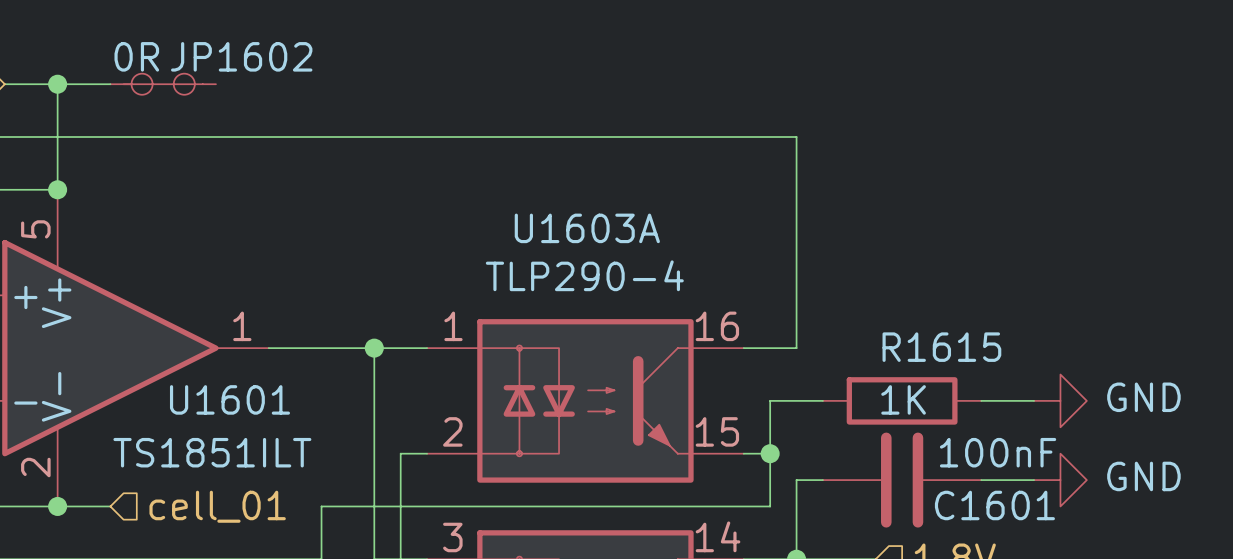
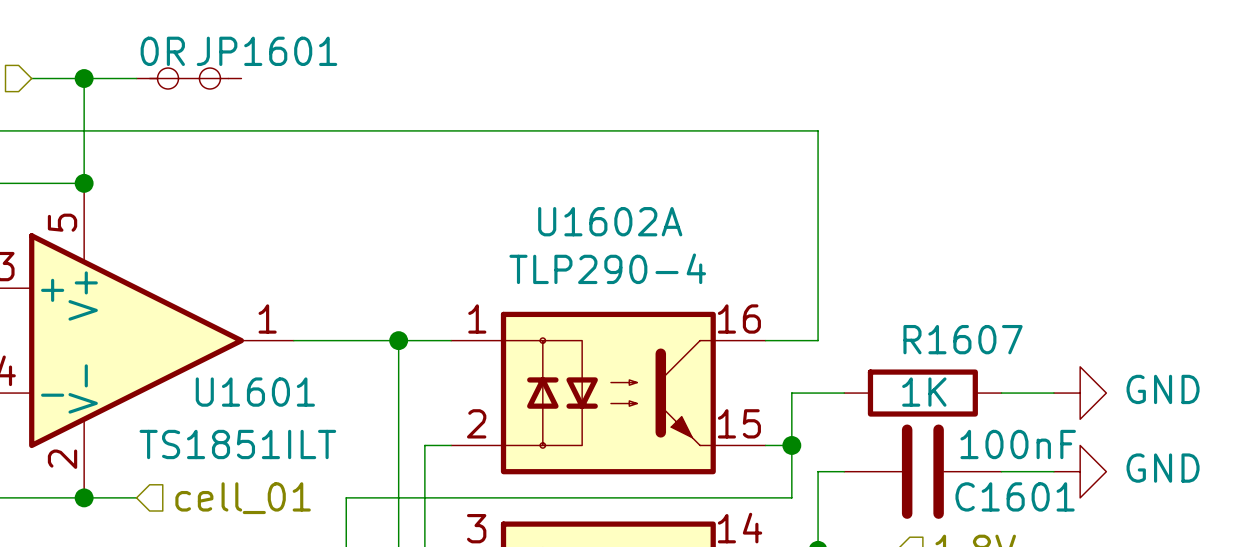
JP1602 name: JP1602 (241, 56) -> JP1601 (266, 51)
U1603A name: U1603A (587, 228) -> U1602A (610, 221)
R1615 name: R1615 (941, 347) -> R1607 (963, 339)

